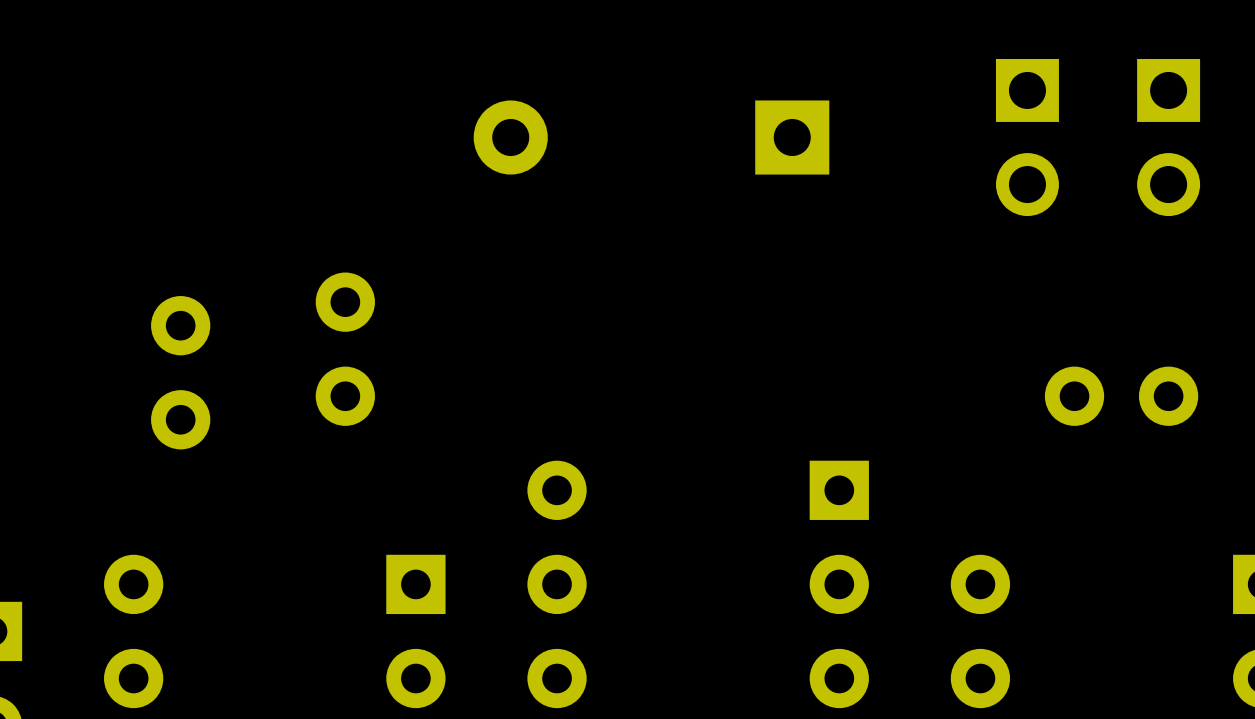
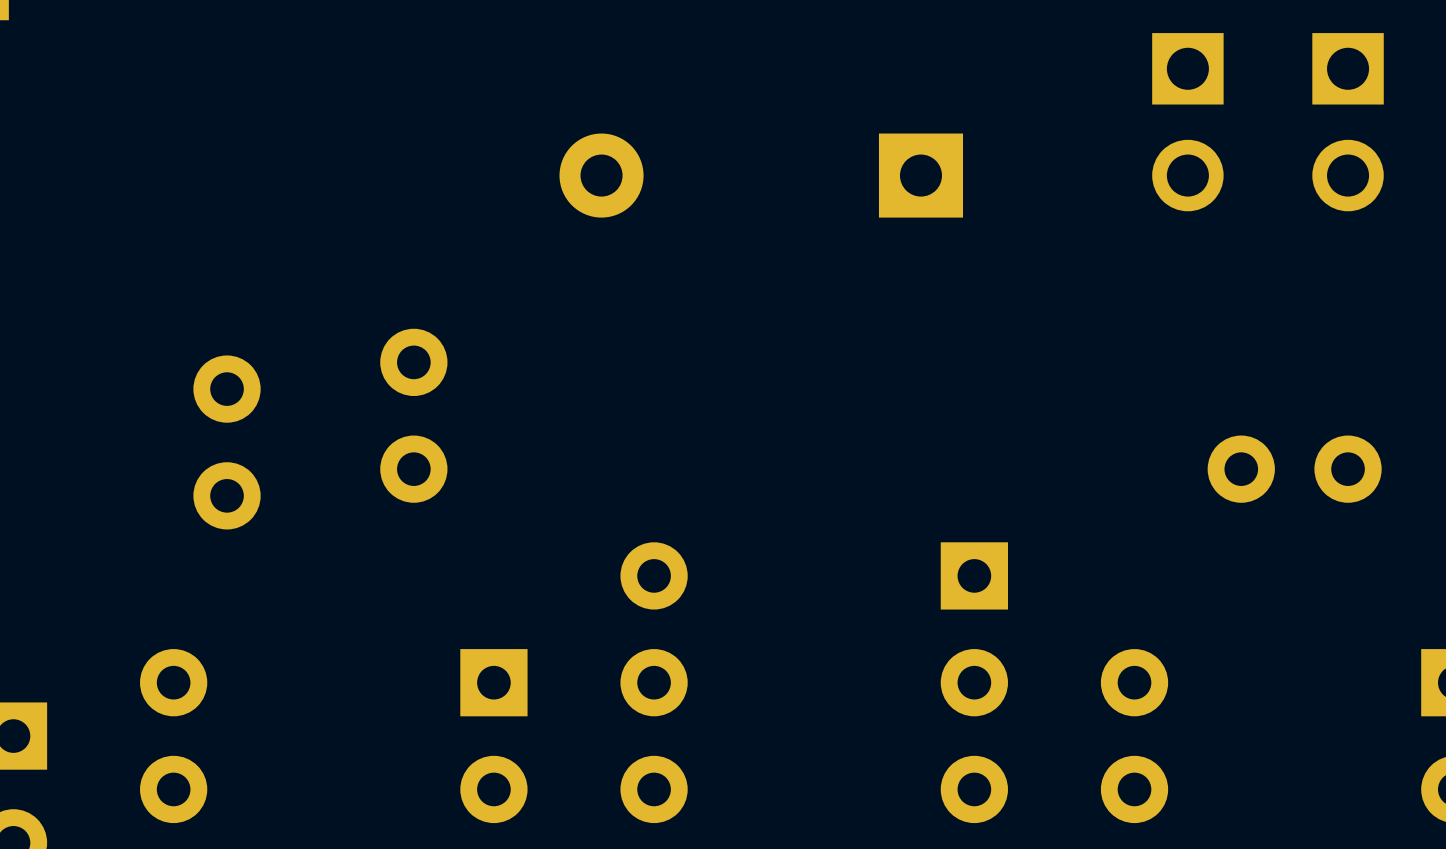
part position: (1027, 137) -> (1187, 122)
part position: (1168, 137) -> (1348, 122)

